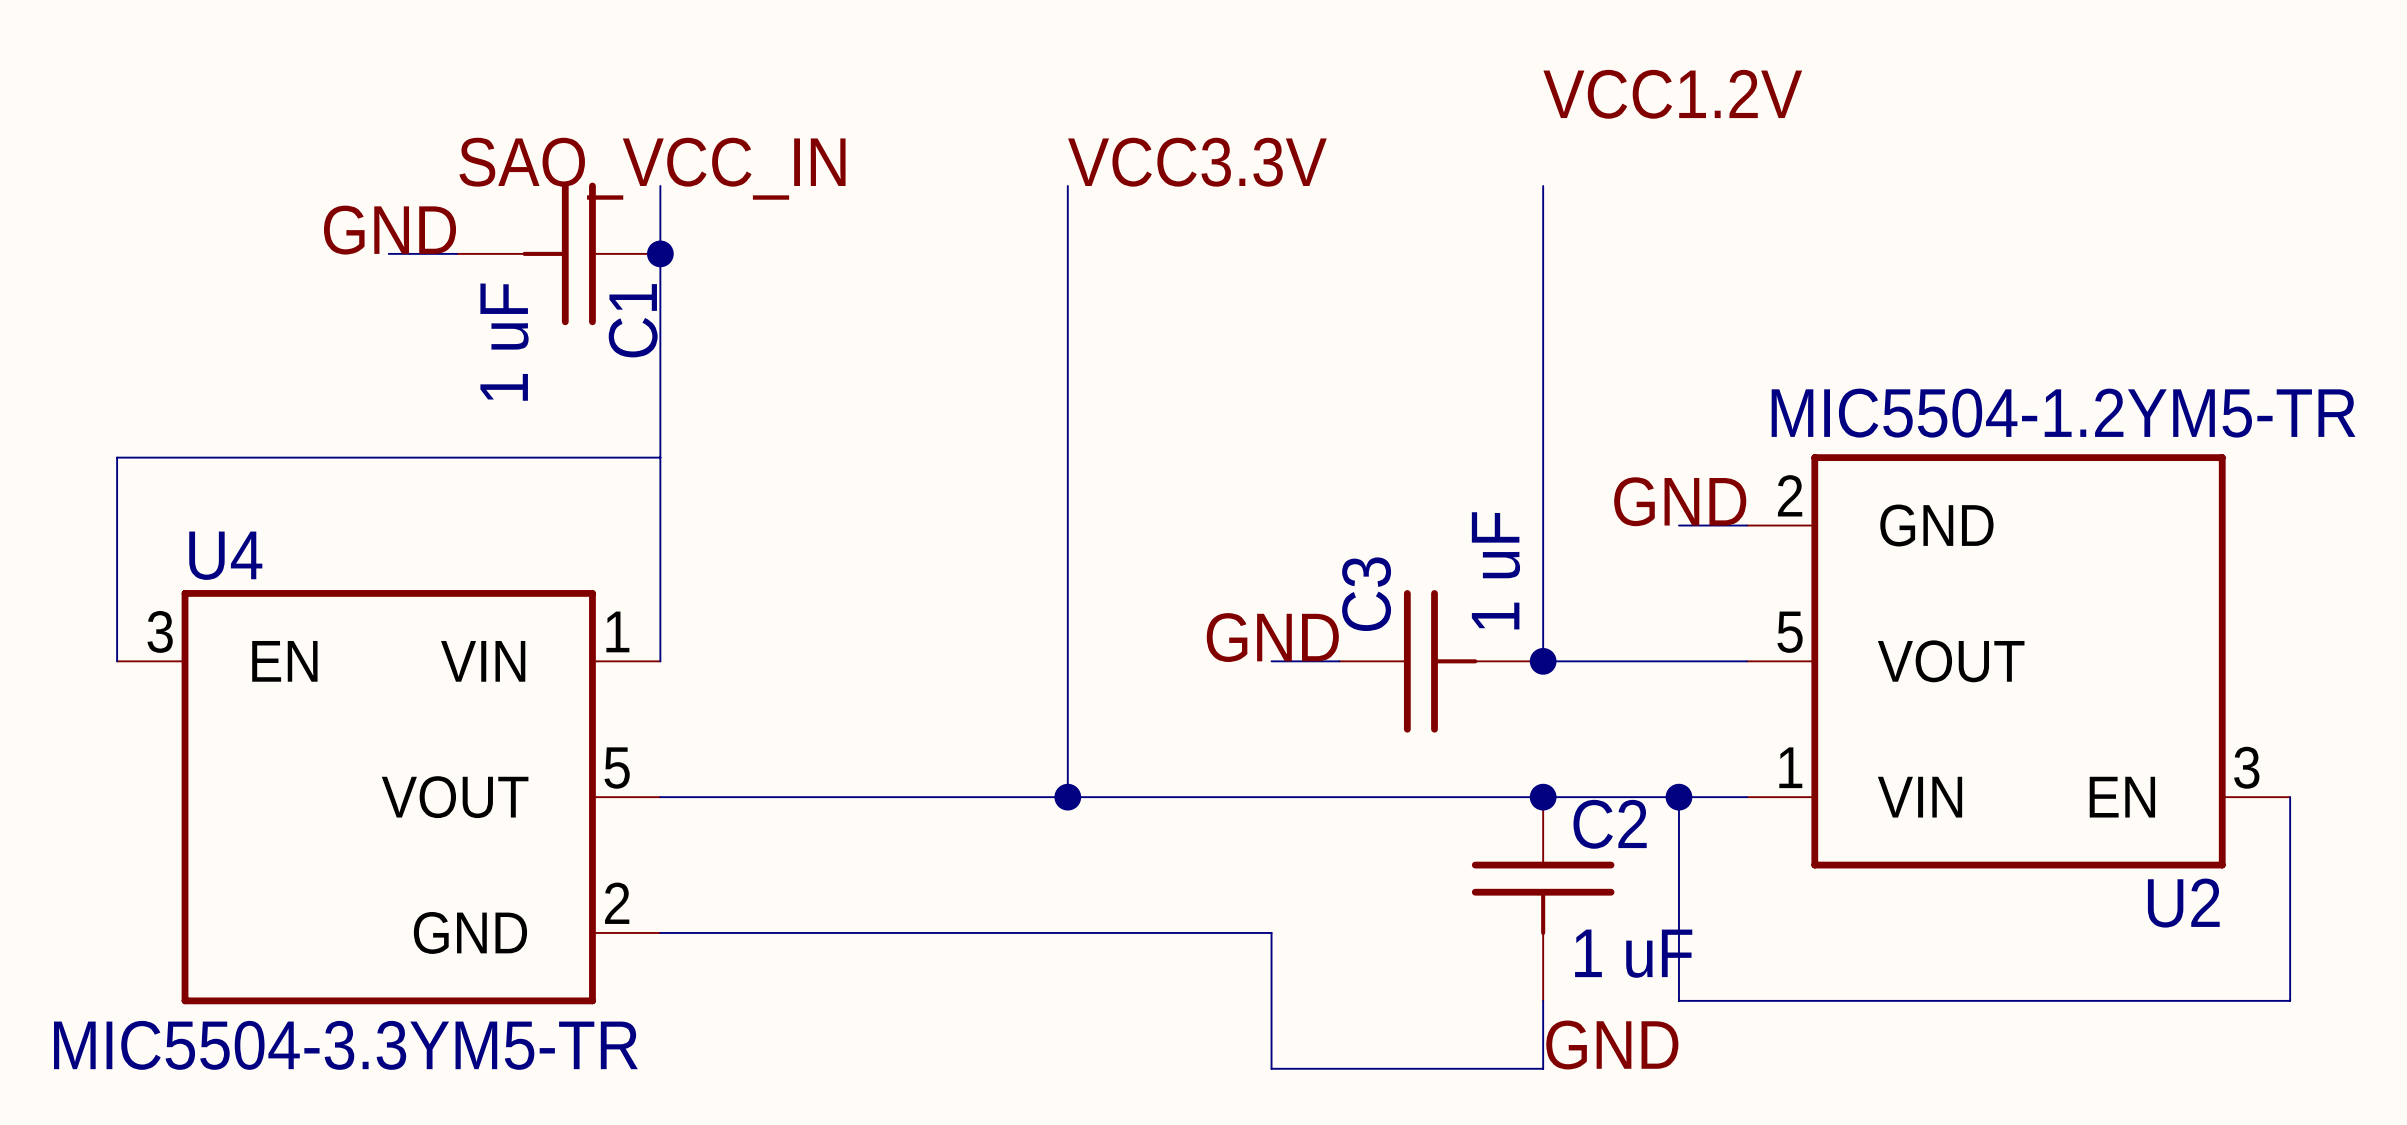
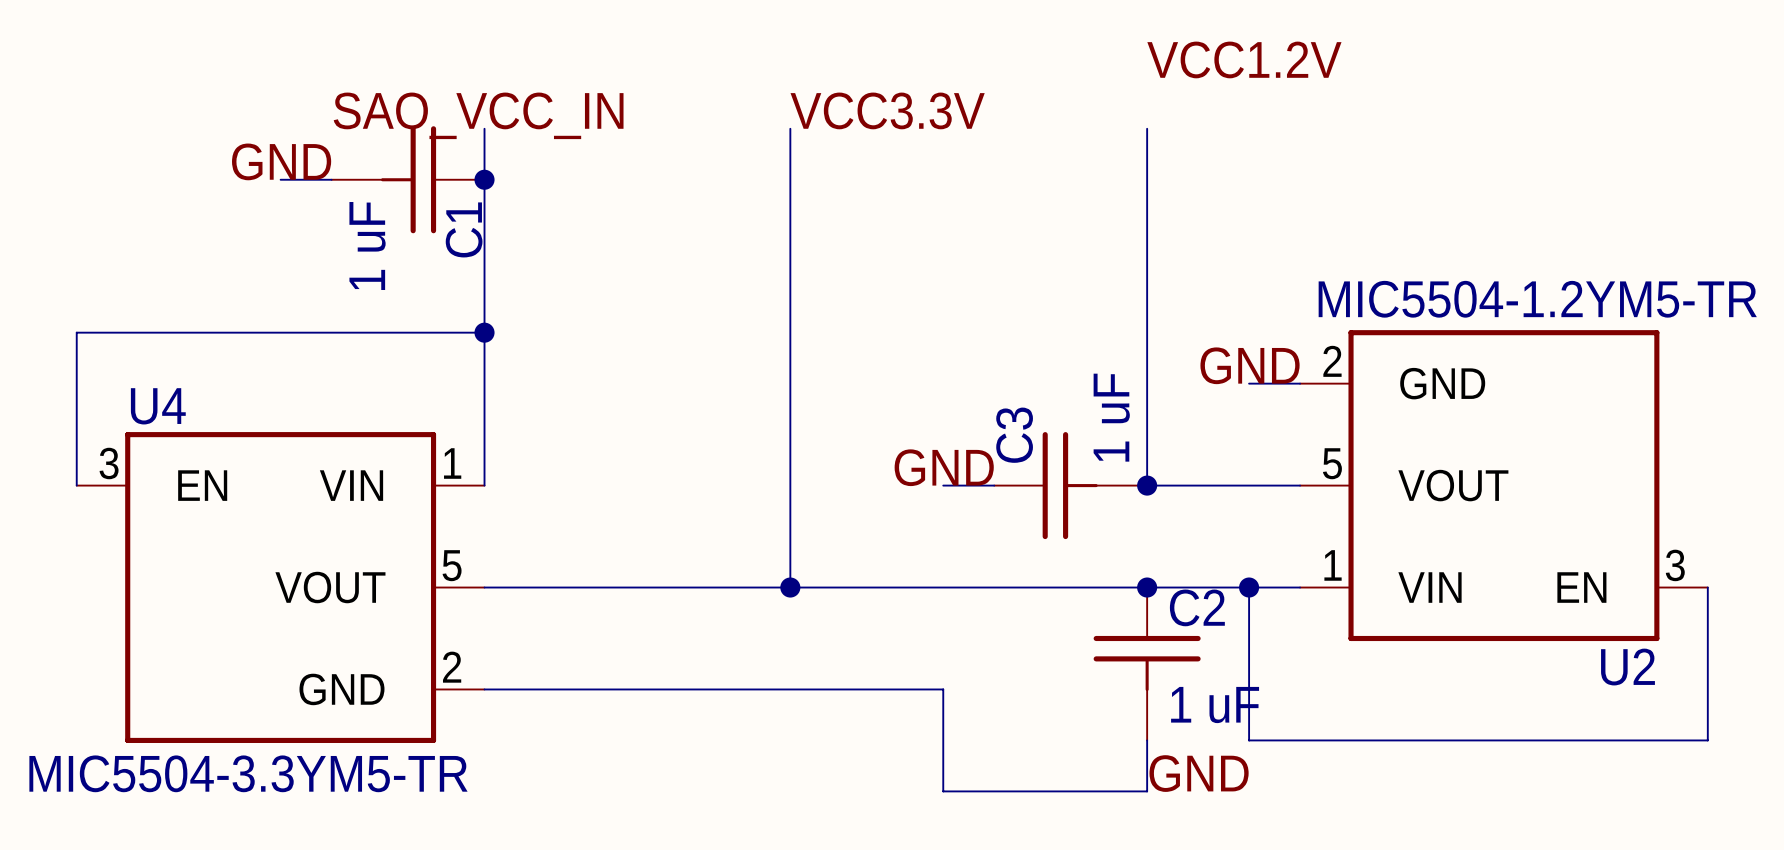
junction: none -> (484, 332)

